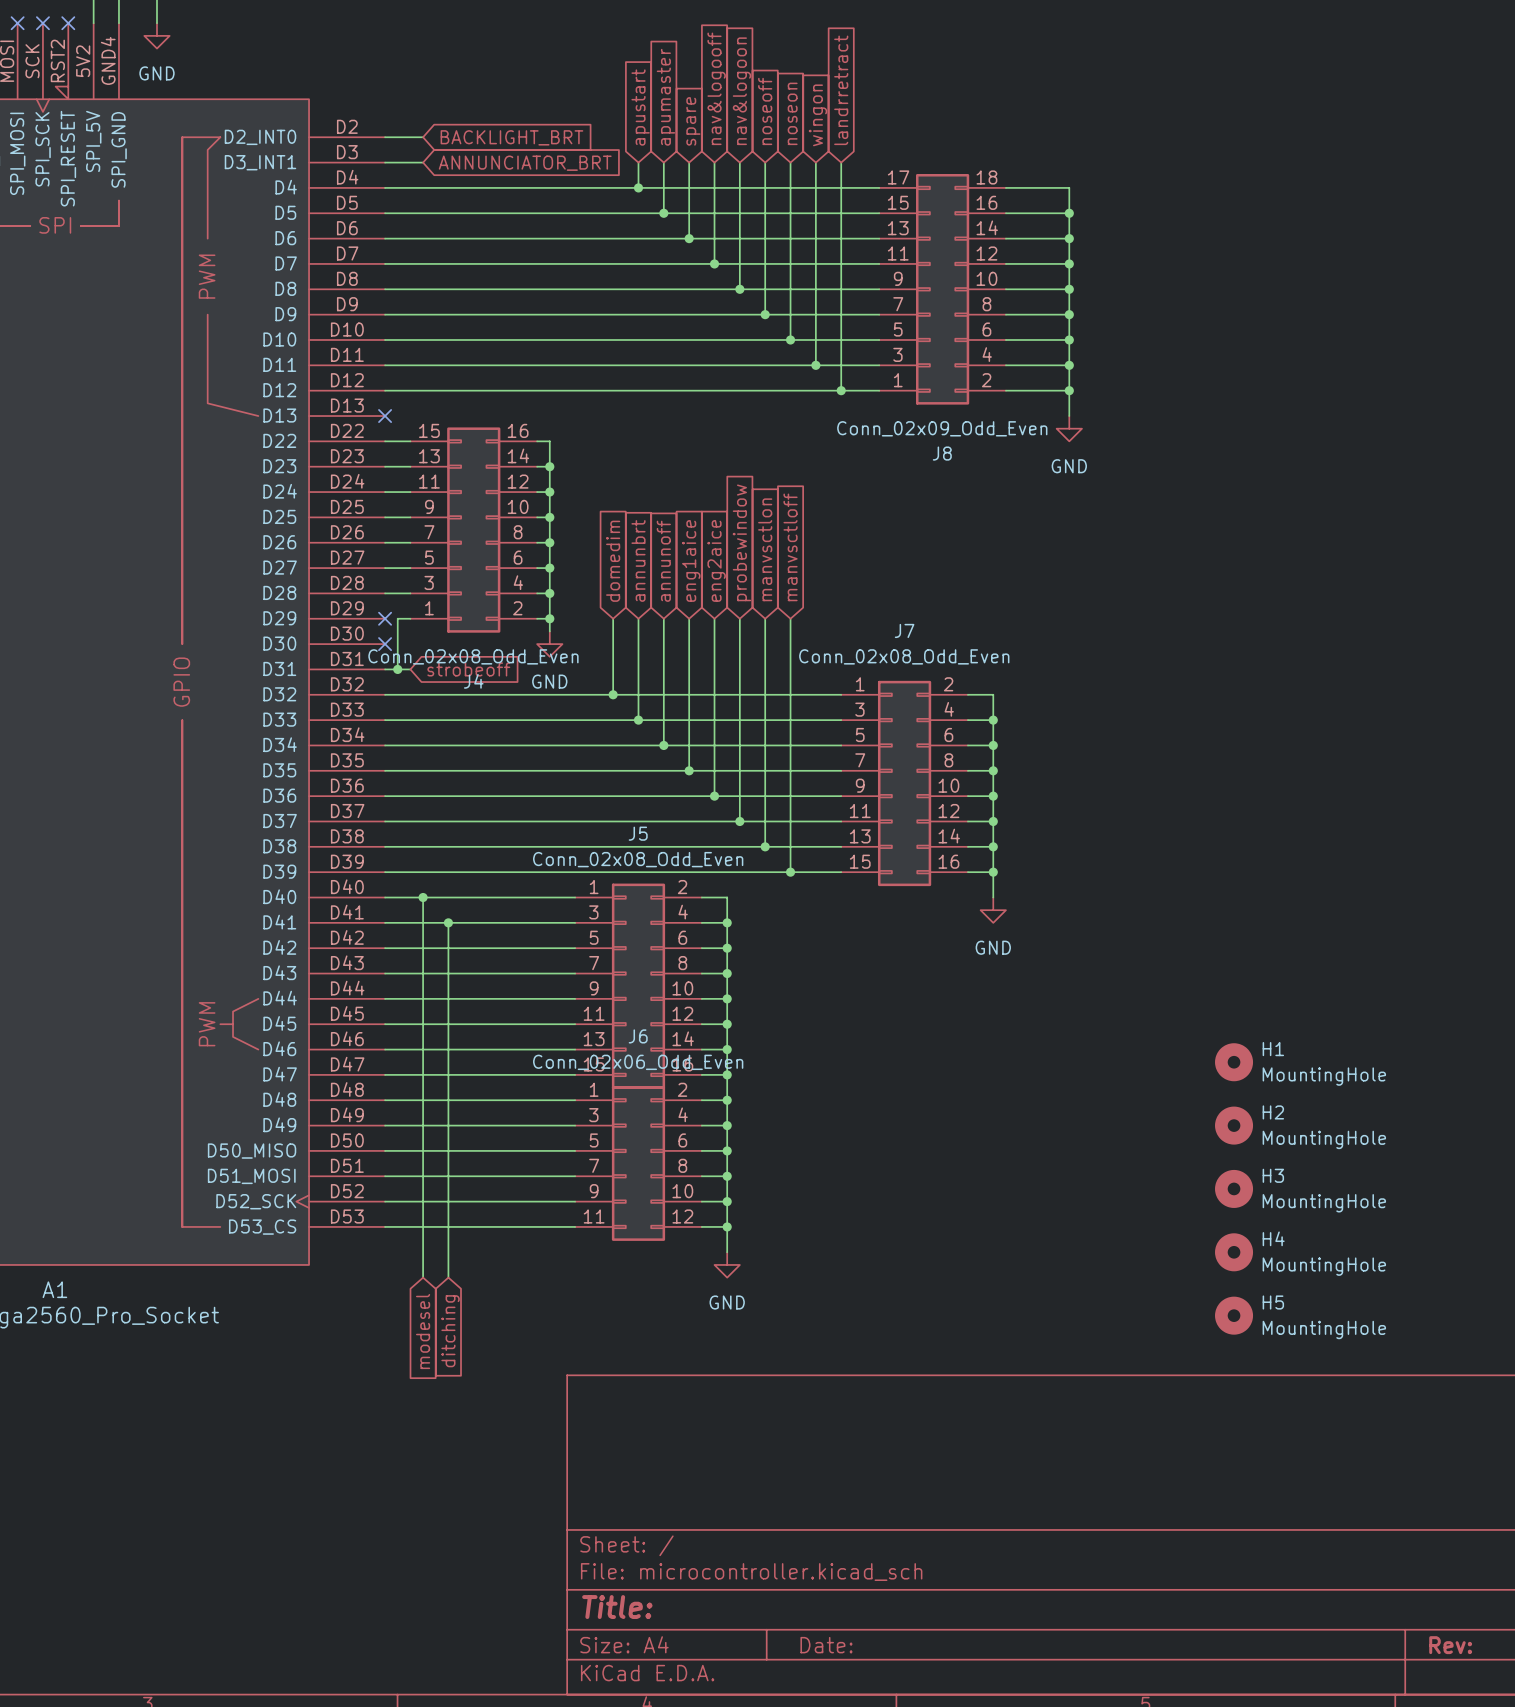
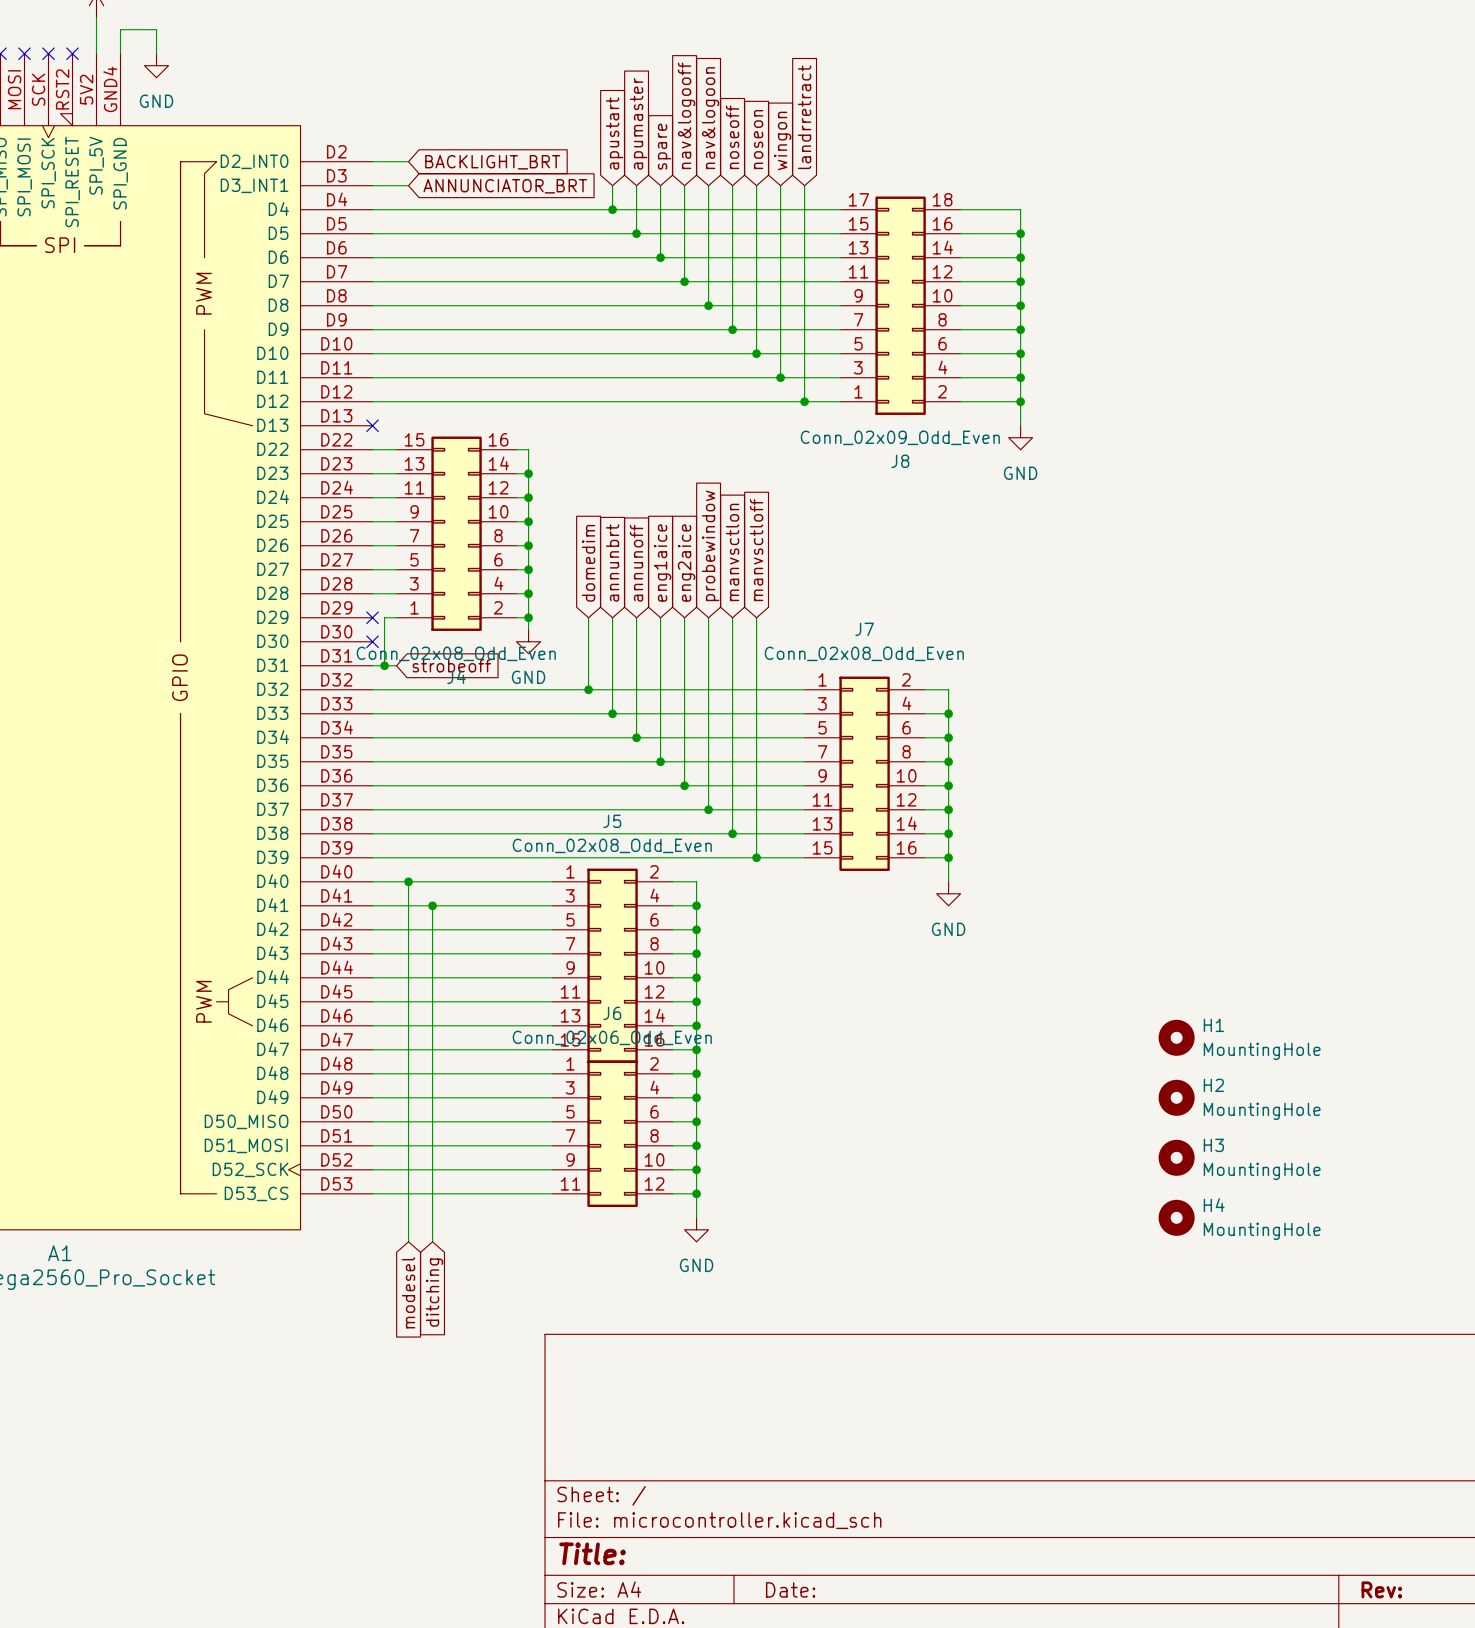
H5: MountingHole (1234, 1315) -> none

